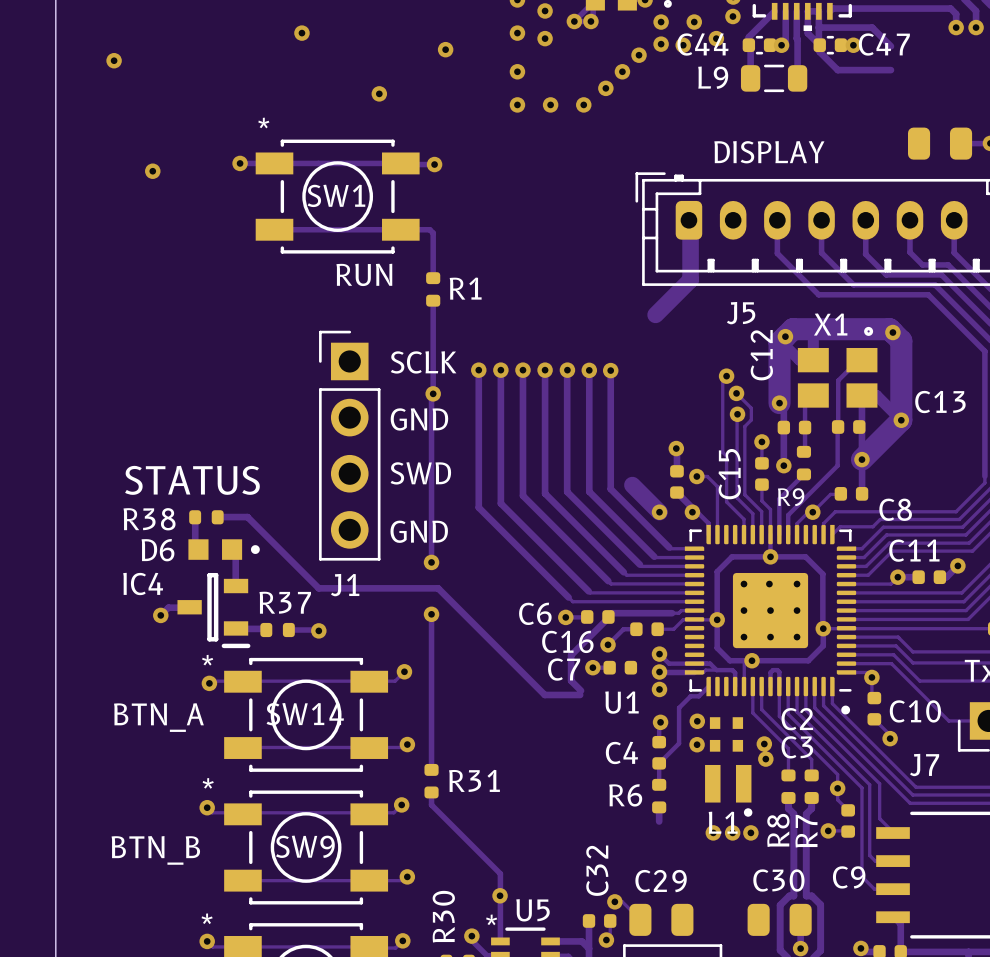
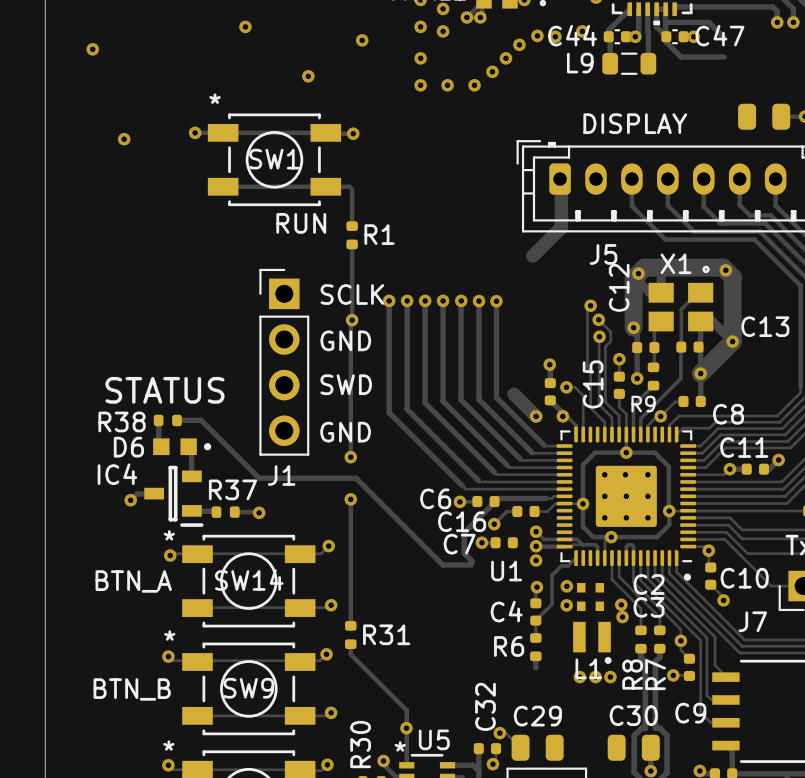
via: (732, 16) -> none
via: (661, 22) -> none
via: (694, 22) -> none

